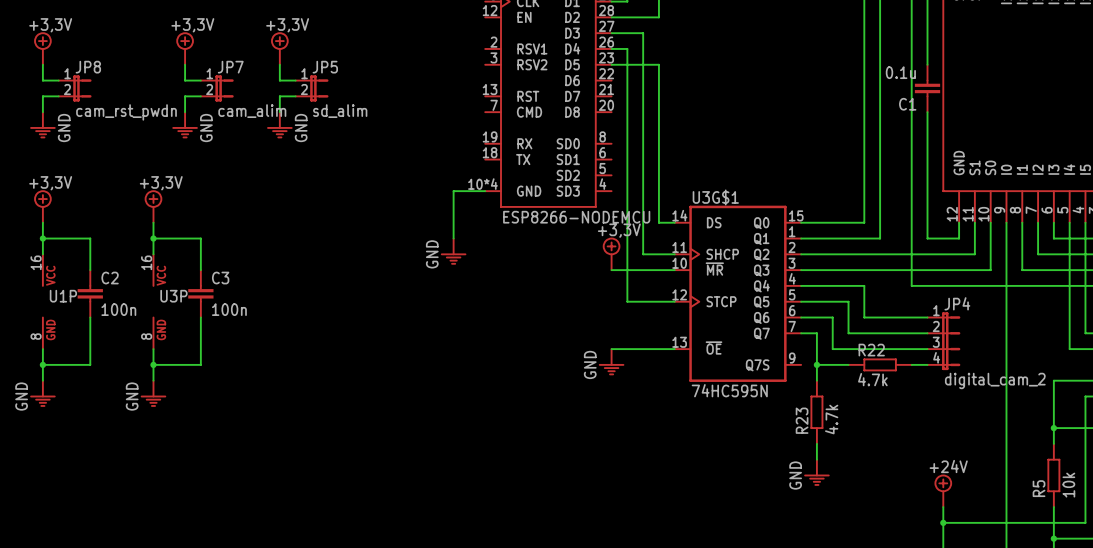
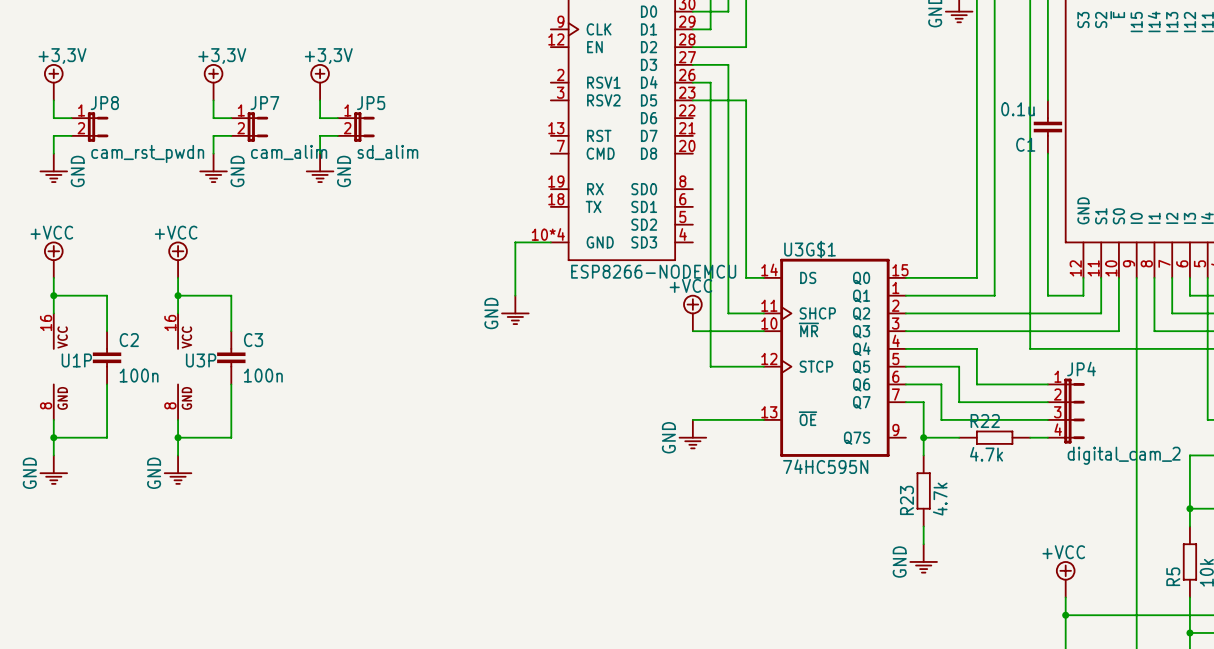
power symbol shape: [34, 190, 52, 223] -> [44, 241, 64, 278]
power symbol shape: [144, 190, 163, 223] -> [168, 241, 188, 278]
power symbol shape: [602, 237, 621, 271] -> [683, 294, 703, 332]
power symbol shape: [934, 474, 952, 508] -> [1055, 561, 1076, 598]

